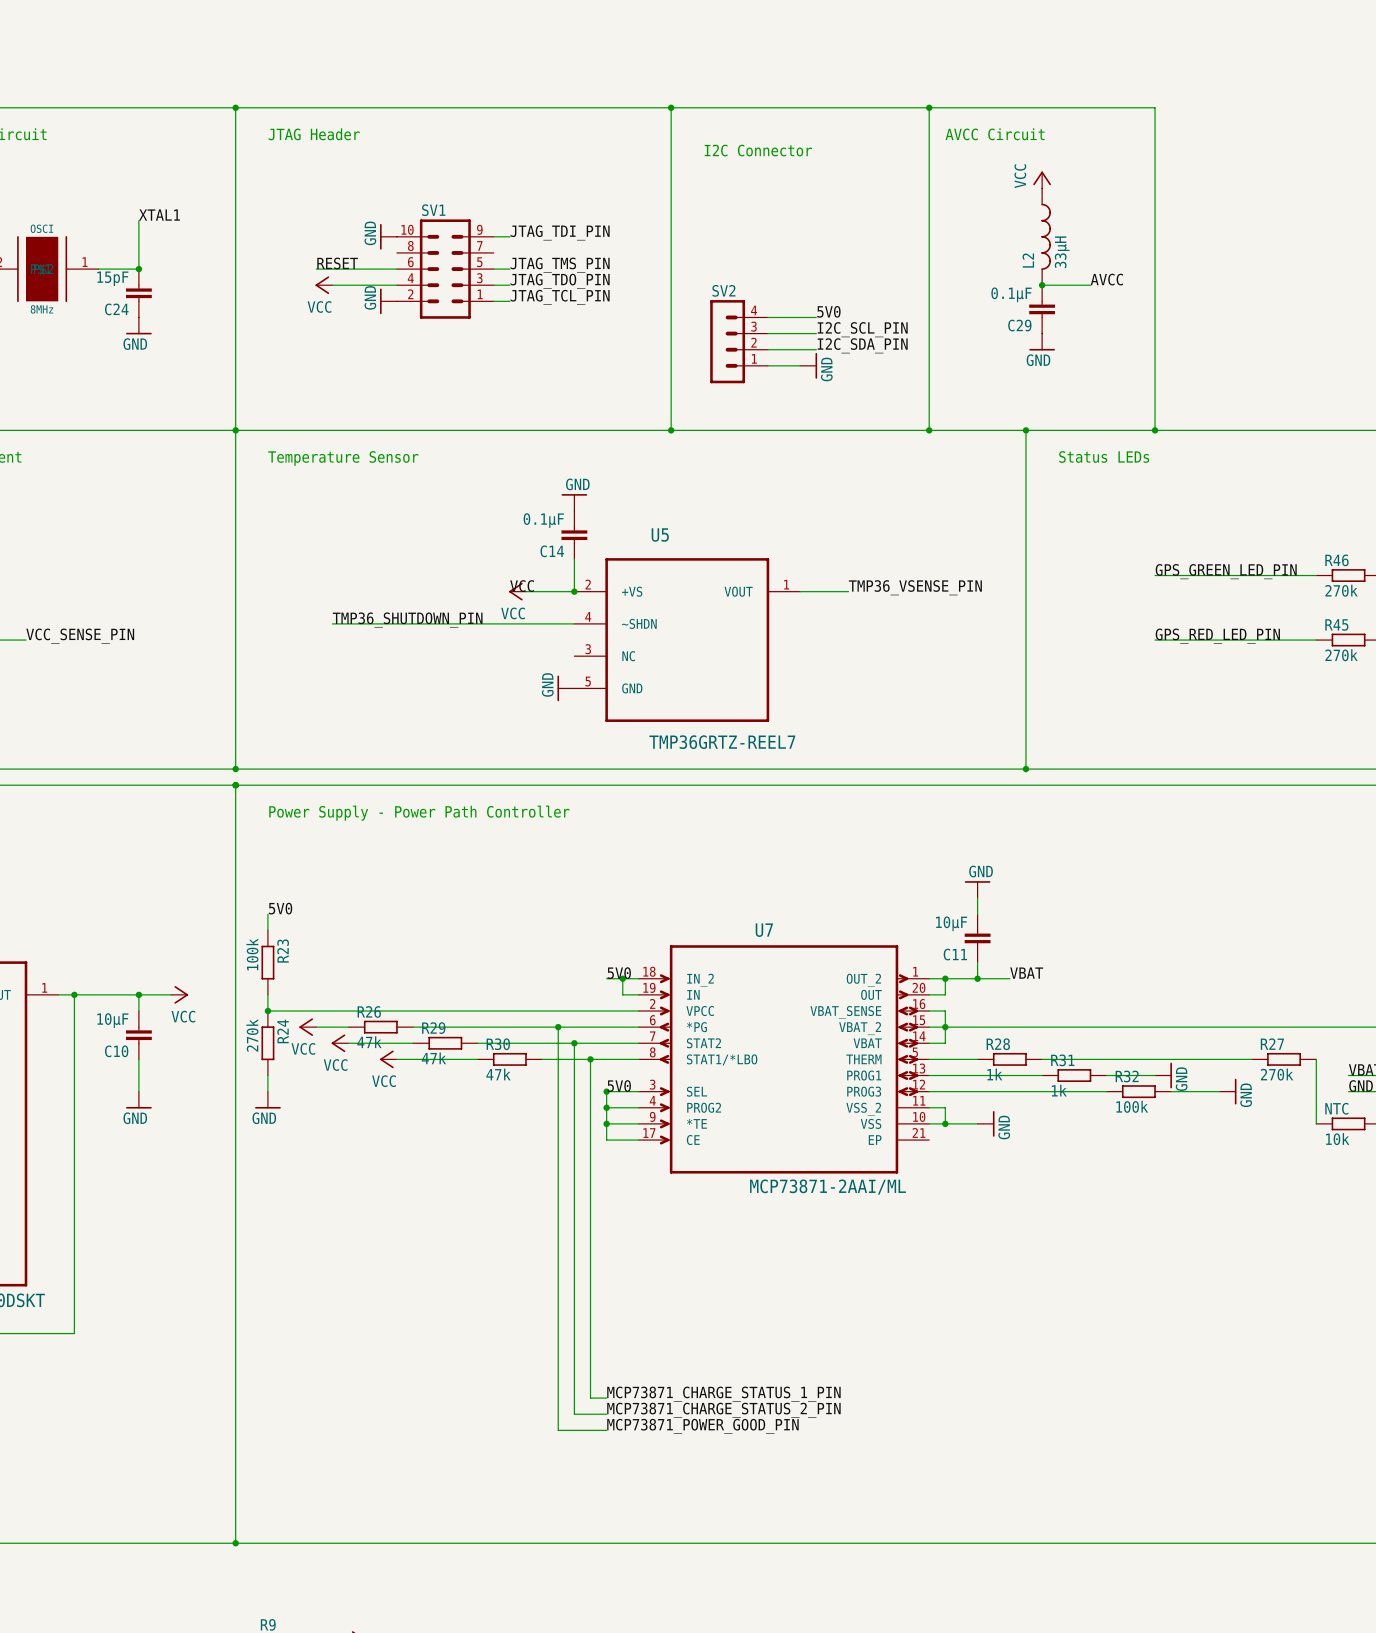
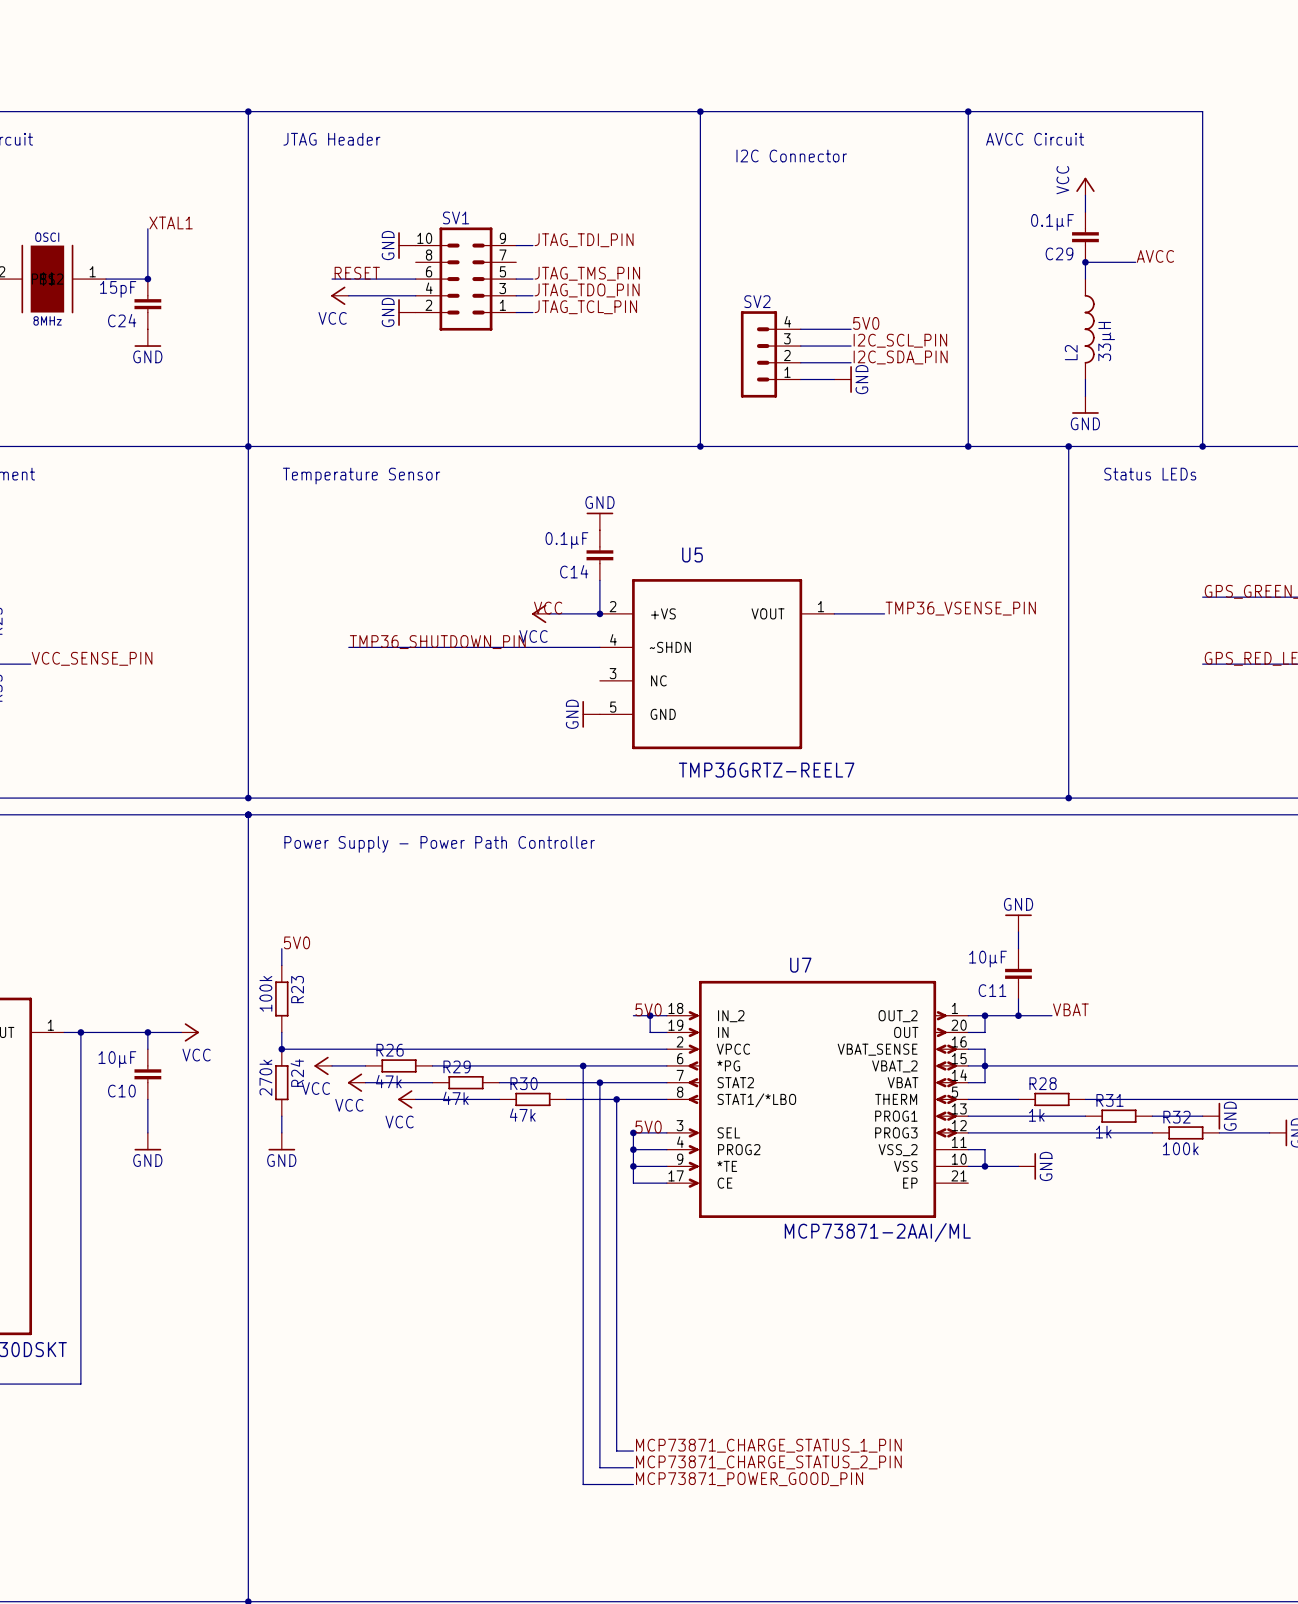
L2 position: (1046, 236) -> (1089, 329)
wire: none -> (1135, 262) (1085, 262) (1085, 279)
label position: AVCC (1106, 279) -> AVCC (1155, 256)
wire: (1042, 285) (1090, 285) -> none
junction position: (1042, 285) -> (1085, 262)
C29 position: (1042, 309) -> (1085, 237)
power symbol position: GND (1042, 342) -> GND (1085, 405)
wire: none -> (1085, 379) (1085, 396)

